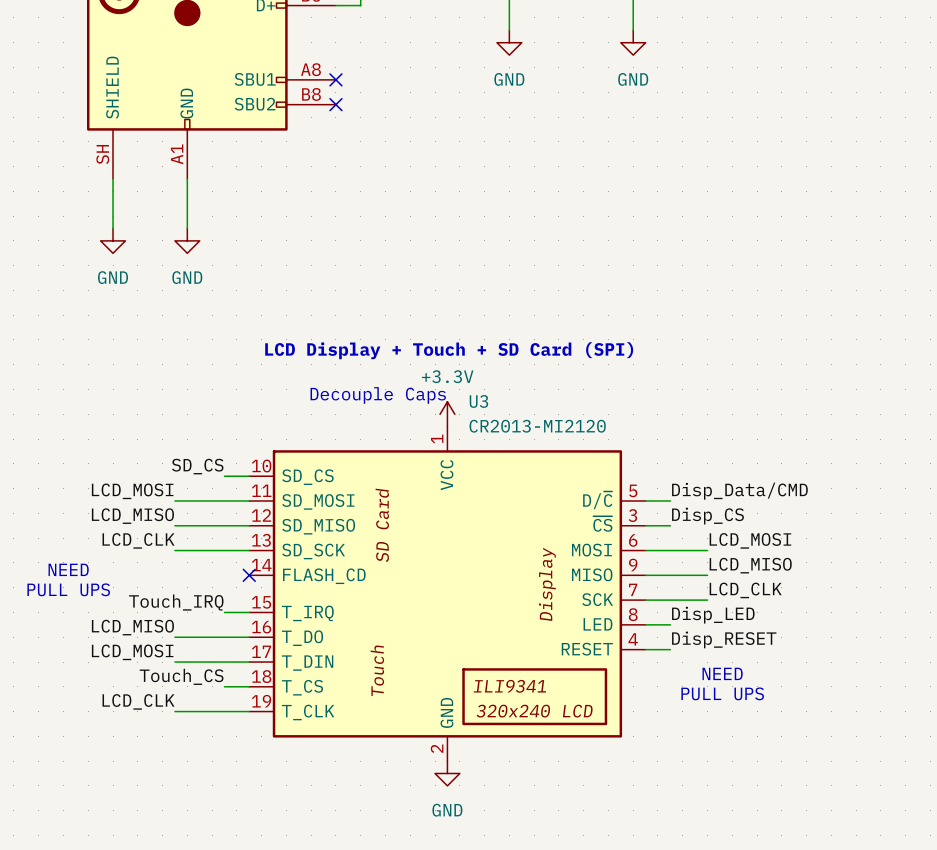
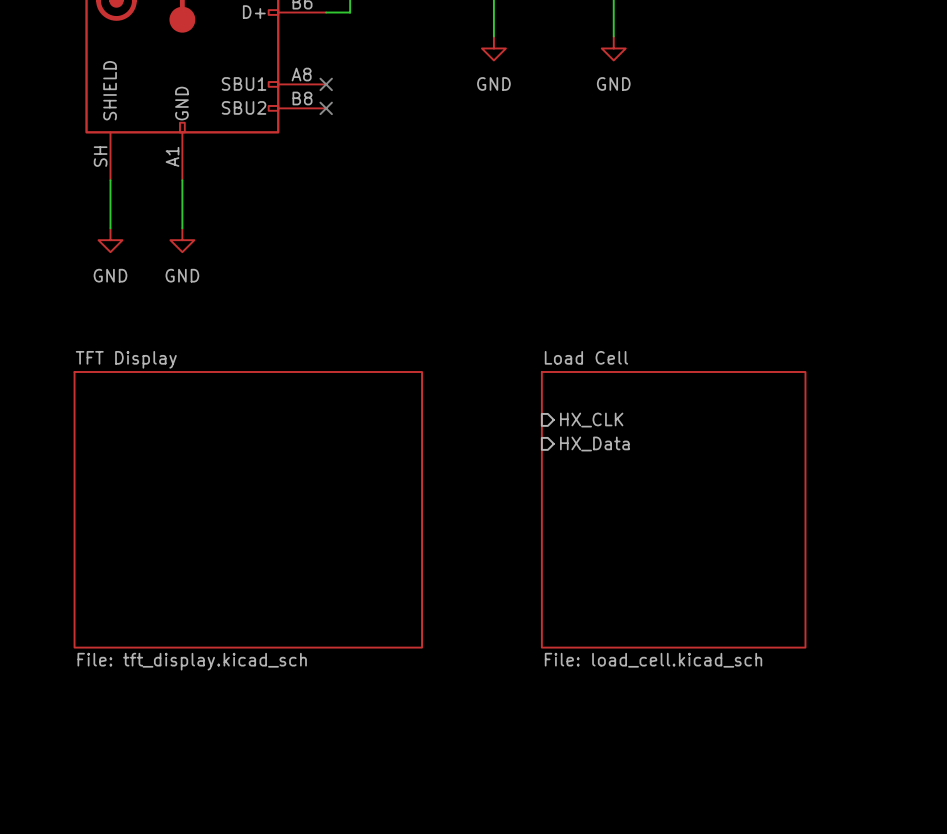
text: LCD Display + Touch + SD Card (SPI) (449, 350) -> none
text: Decouple Caps (378, 395) -> none
power symbol: +3.3V (447, 414) -> none
sheet pin: none -> HX_CLK (591, 420)
sheet pin: none -> HX_Data (594, 444)
label: SD_CS (197, 466) -> none
wire: (224, 476) (249, 476) -> none
label: LCD_MOSI (132, 491) -> none
label: Disp_Data/CMD (739, 491) -> none
wire: (174, 501) (249, 501) -> none
wire: (645, 501) (670, 501) -> none
label: LCD_MISO (132, 516) -> none
label: Disp_CS (707, 516) -> none
sheet TFT Display: none -> File: tft_display.kicad_sch (248, 509)
sheet Load Cell: none -> File: load_cell.kicad_sch (673, 509)
wire: (174, 525) (249, 525) -> none
wire: (645, 525) (670, 525) -> none
label: LCD_CLK (138, 540) -> none
label: LCD_MOSI (750, 540) -> none
wire: (174, 550) (249, 550) -> none
wire: (645, 550) (707, 550) -> none
label: LCD_MISO (750, 565) -> none
text: NEED (68, 569) -> none
no-connect mark: (249, 575) -> none
wire: (645, 575) (707, 575) -> none
text: PULL UPS (68, 589) -> none
label: LCD_CLK (745, 590) -> none
U3: CR2013-MI2120 (447, 593) -> none
wire: (645, 600) (707, 600) -> none
label: Touch_IRQ (176, 602) -> none
wire: (224, 612) (249, 612) -> none
label: Disp_LED (713, 615) -> none
wire: (645, 624) (670, 624) -> none
label: LCD_MISO (132, 627) -> none
wire: (174, 637) (249, 637) -> none
label: Disp_RESET (724, 639) -> none
wire: (645, 649) (670, 649) -> none
label: LCD_MOSI (132, 652) -> none
text: NEED (722, 673) -> none
label: Touch_CS (181, 676) -> none
wire: (224, 686) (249, 686) -> none
text: PULL UPS (722, 693) -> none
label: LCD_CLK (138, 701) -> none
wire: (174, 711) (249, 711) -> none
power symbol: GND (447, 773) -> none

